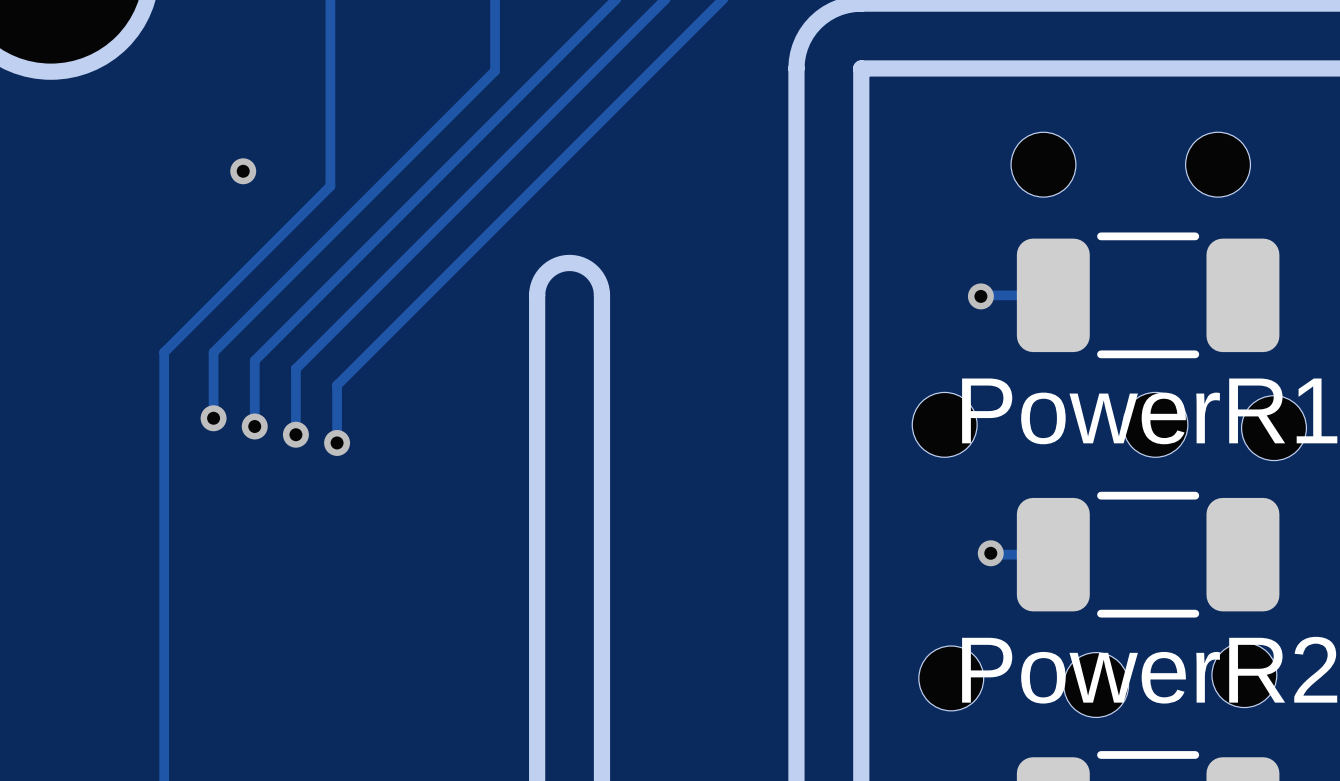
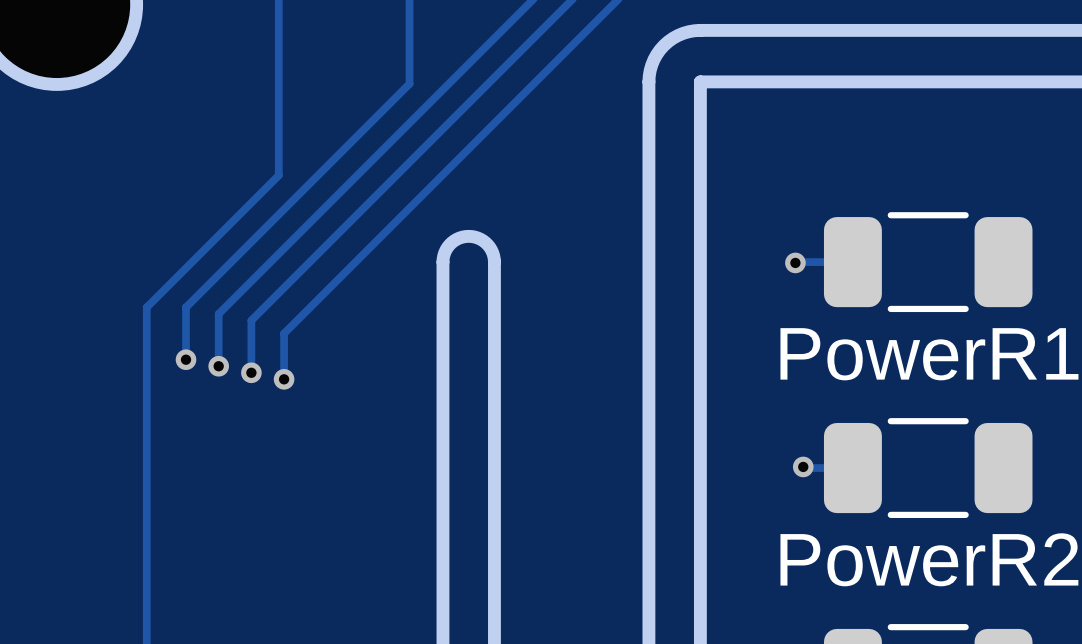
part: (1043, 164) -> none
part: (1218, 164) -> none
via: (243, 171) -> none
part: (944, 424) -> none
part: (1155, 424) -> none
part: (1274, 428) -> none
part: (1244, 675) -> none
part: (951, 678) -> none
part: (1096, 685) -> none

